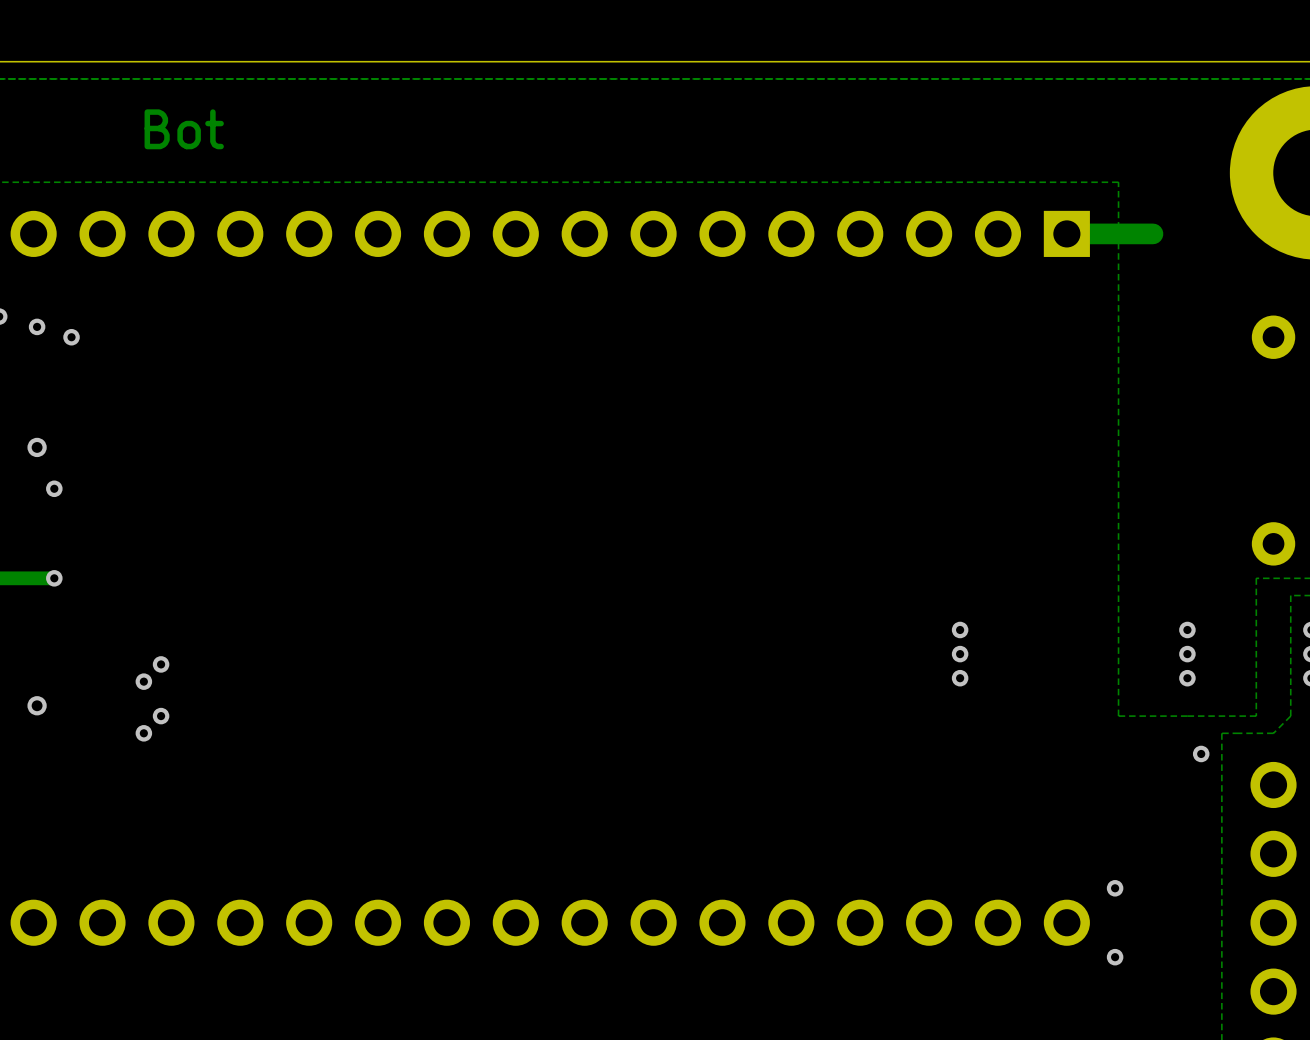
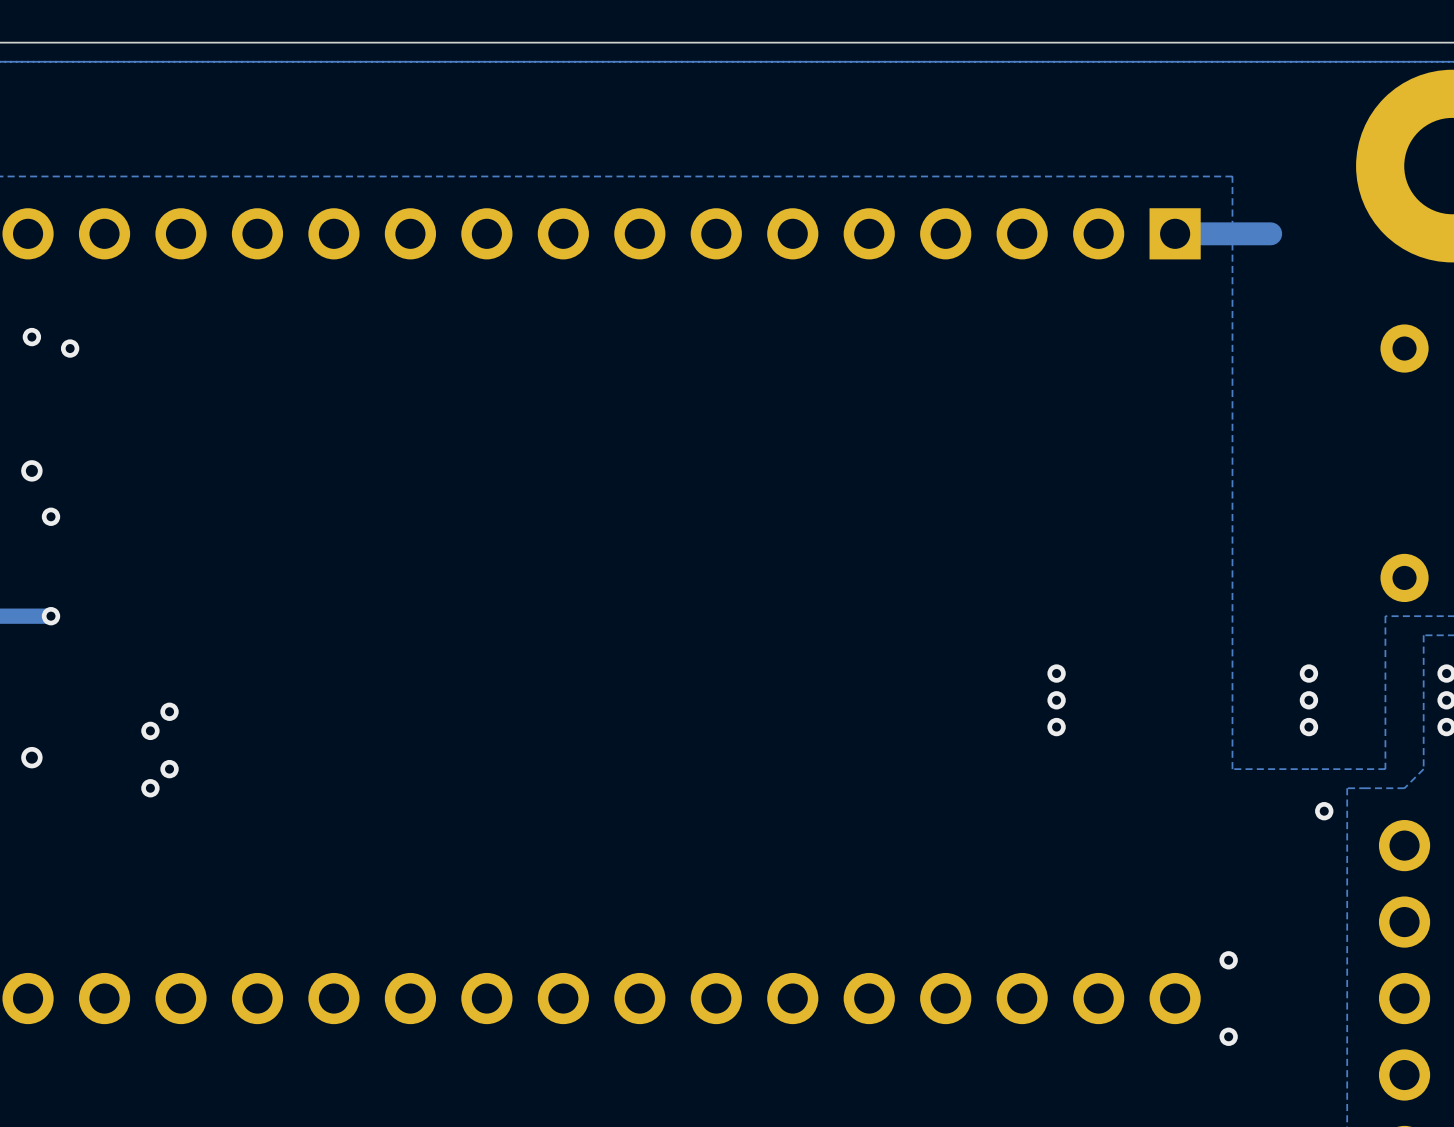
text: Bot (184, 129) -> none

